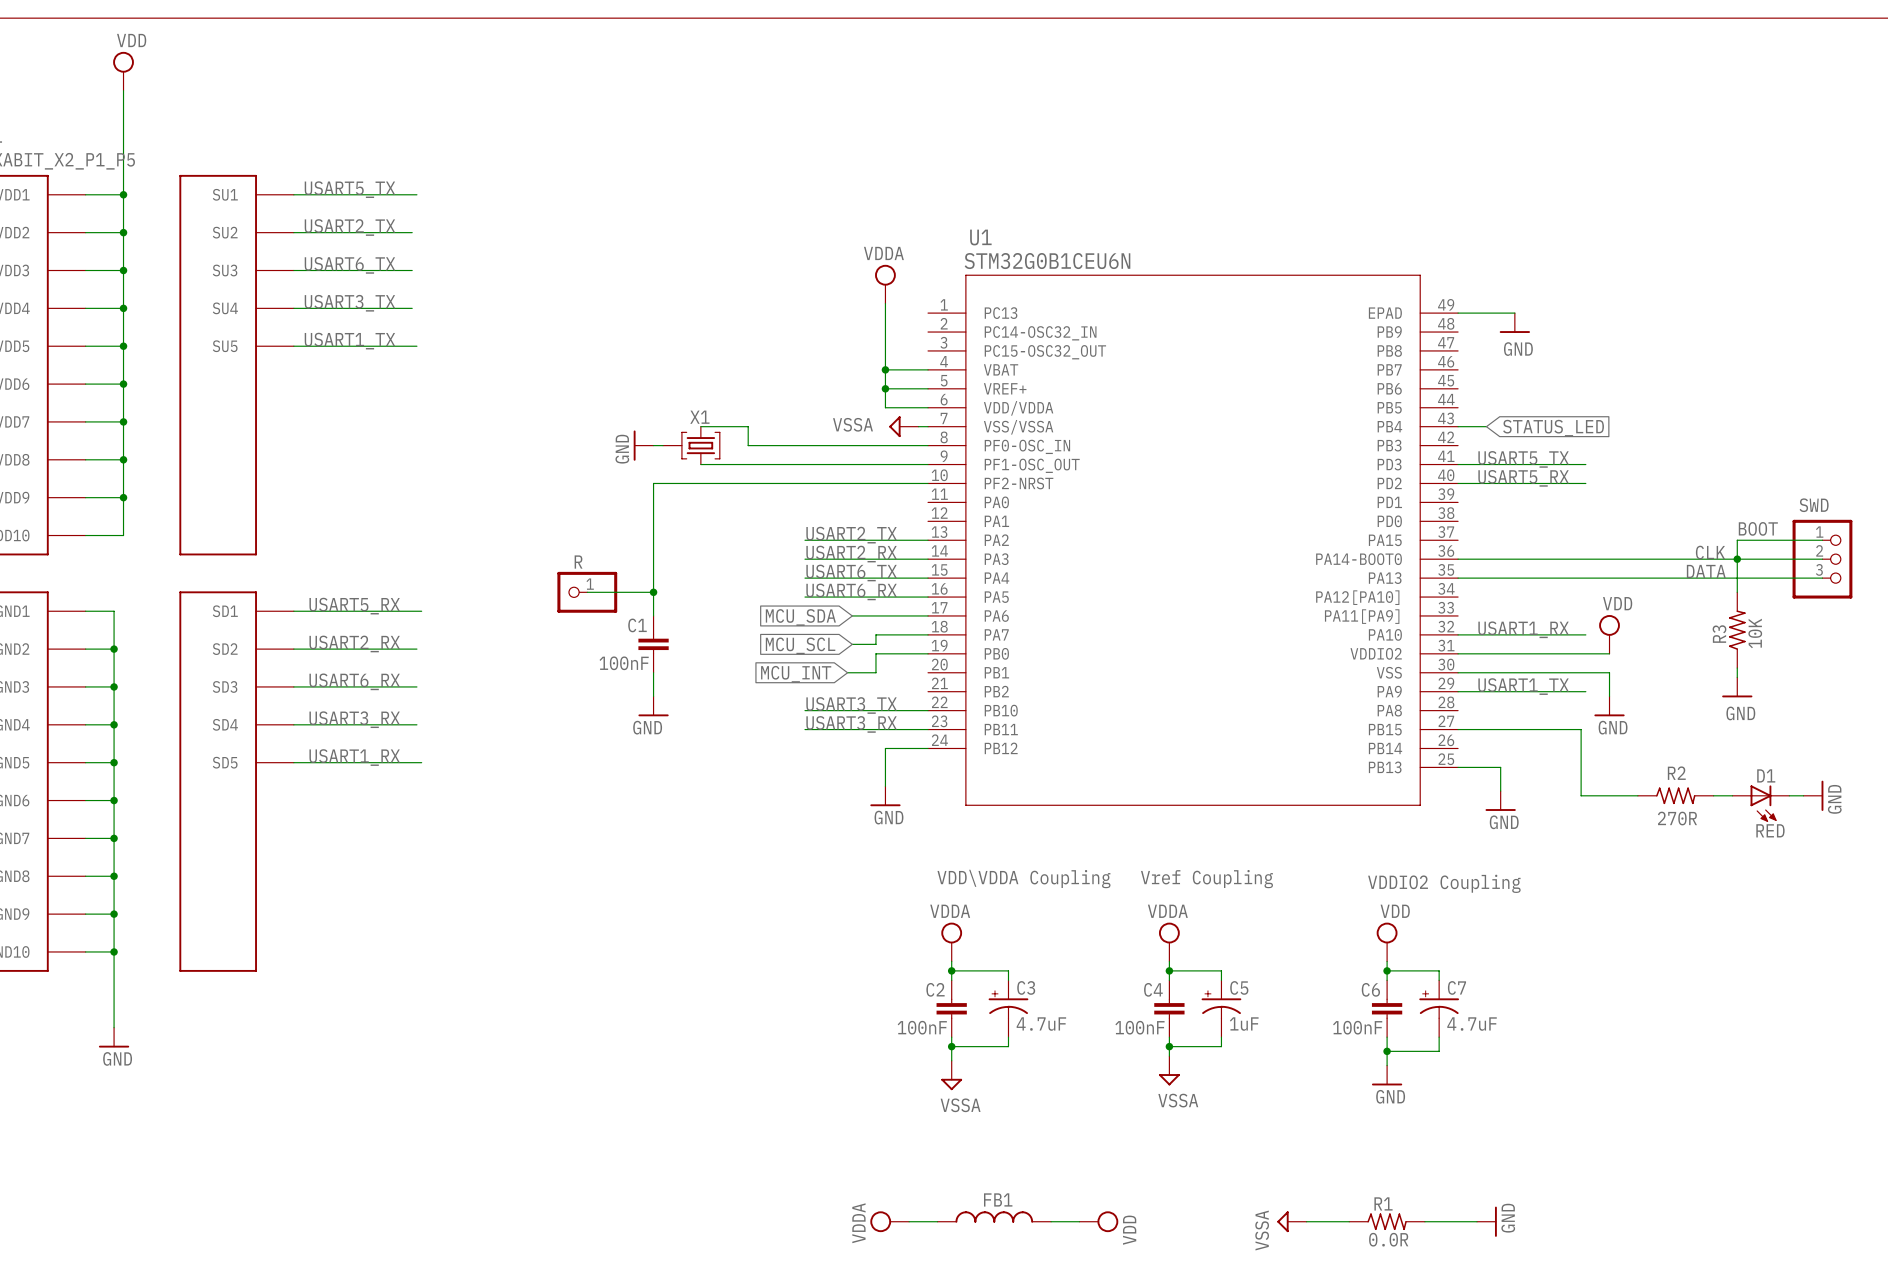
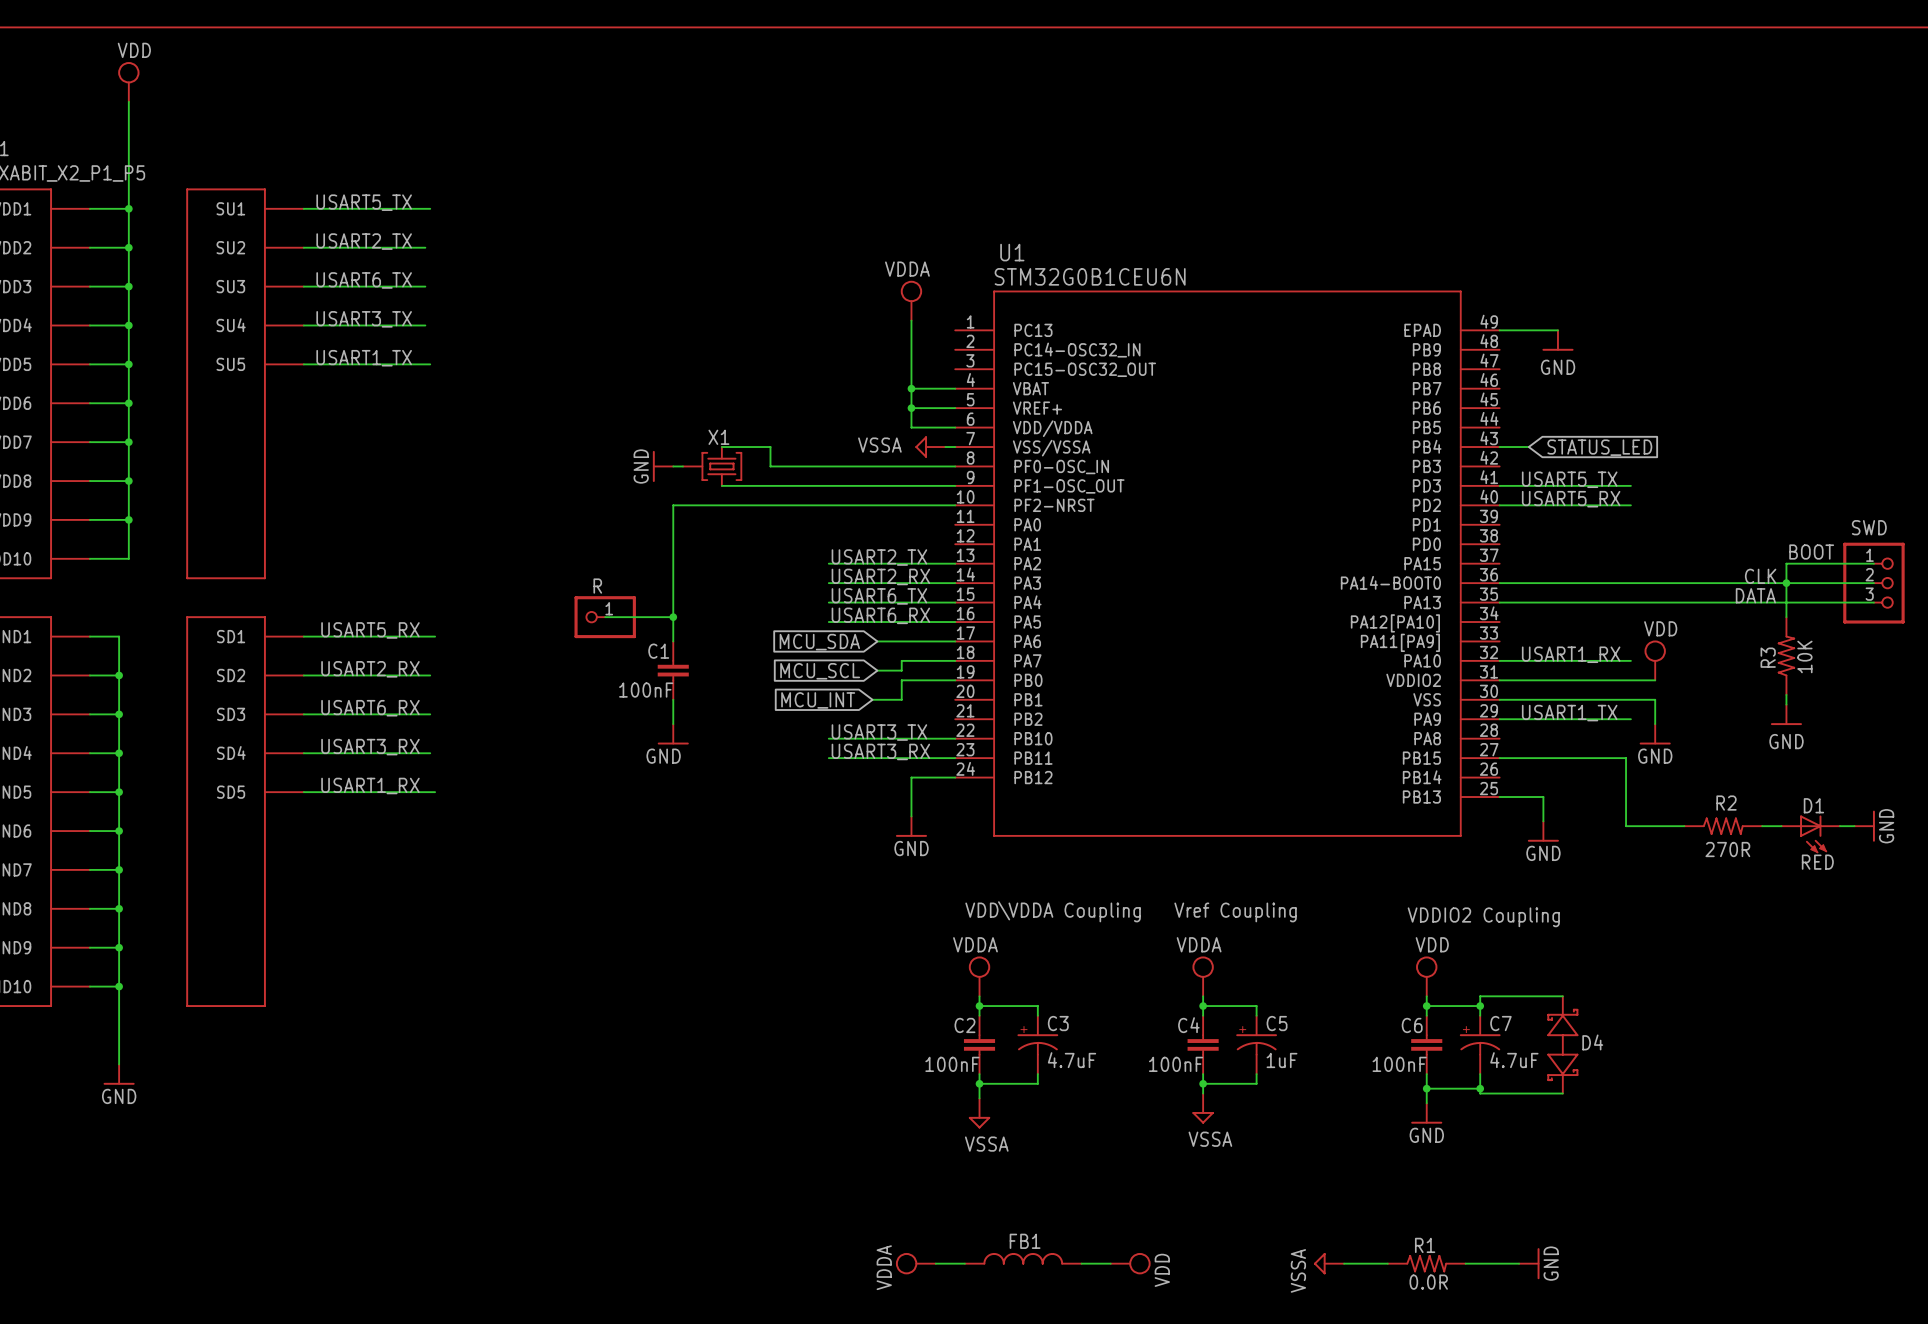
wire: none -> (1562, 996) (1480, 996) (1480, 1006)
junction: none -> (1480, 1006)
D4: none -> (1562, 1044)
wire: none -> (1480, 1088) (1480, 1093) (1562, 1093)
junction: none -> (1480, 1088)

